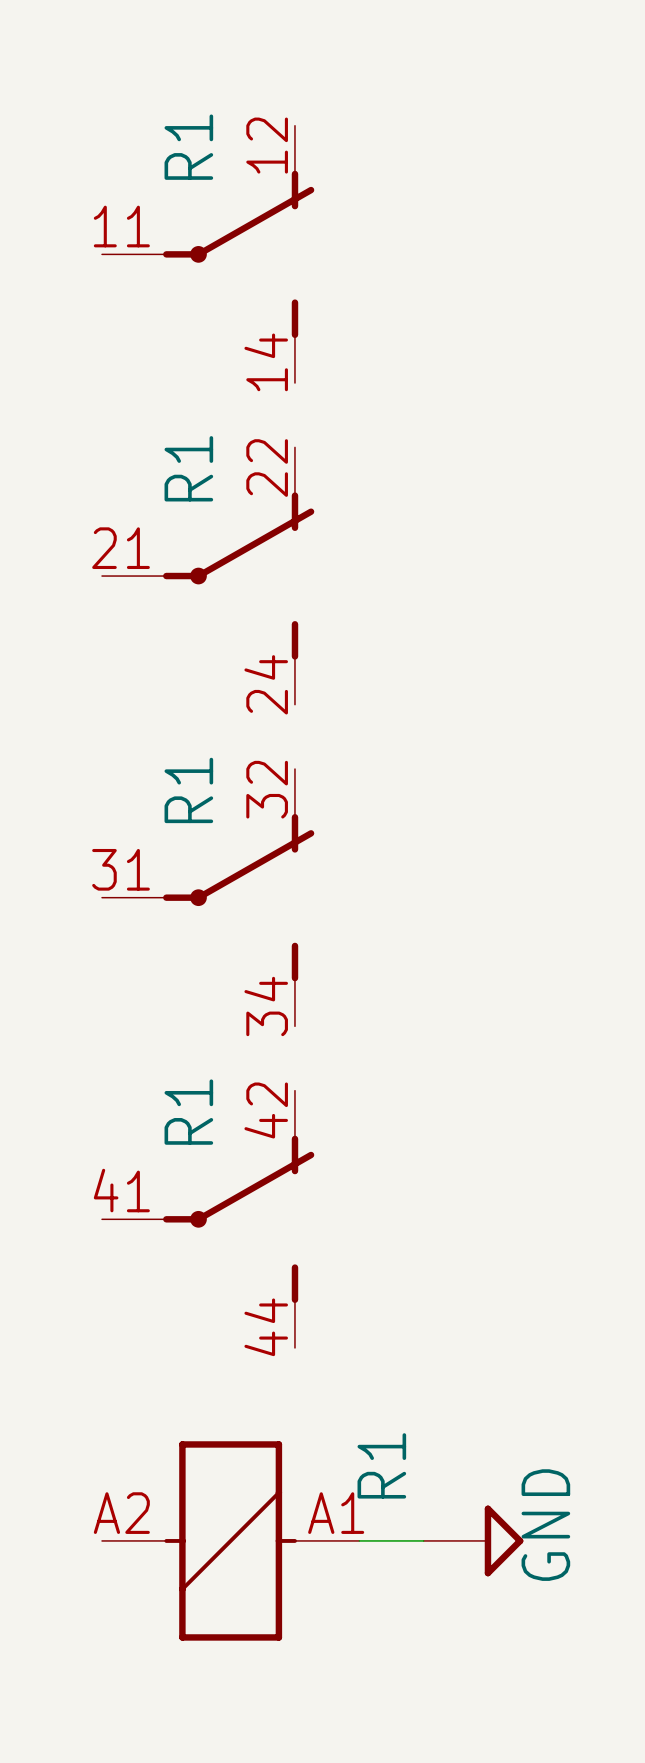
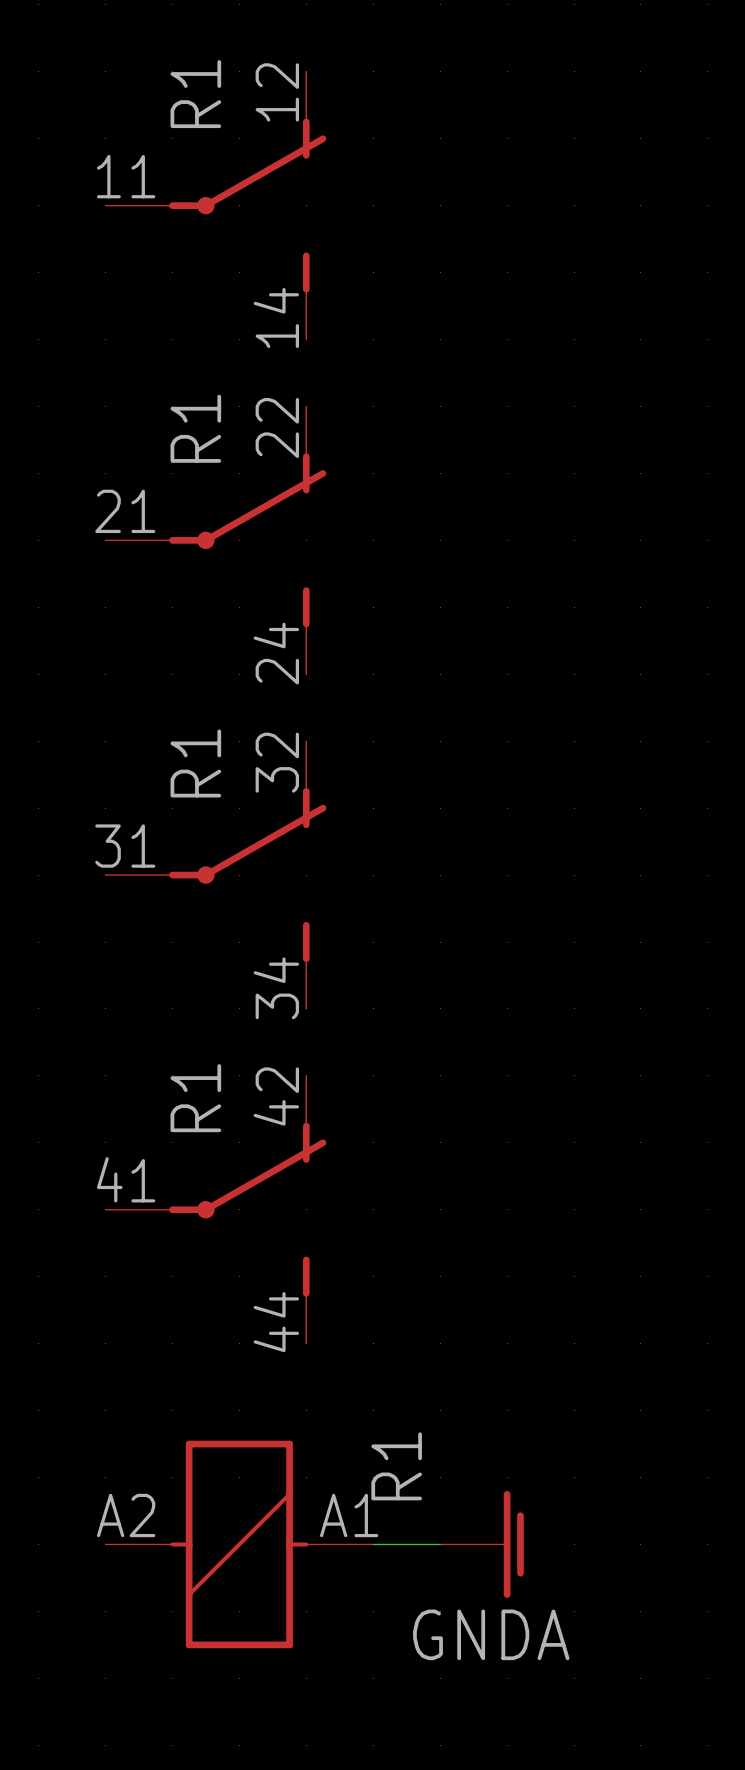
power symbol: GND (473, 1540) -> GNDA (482, 1544)

